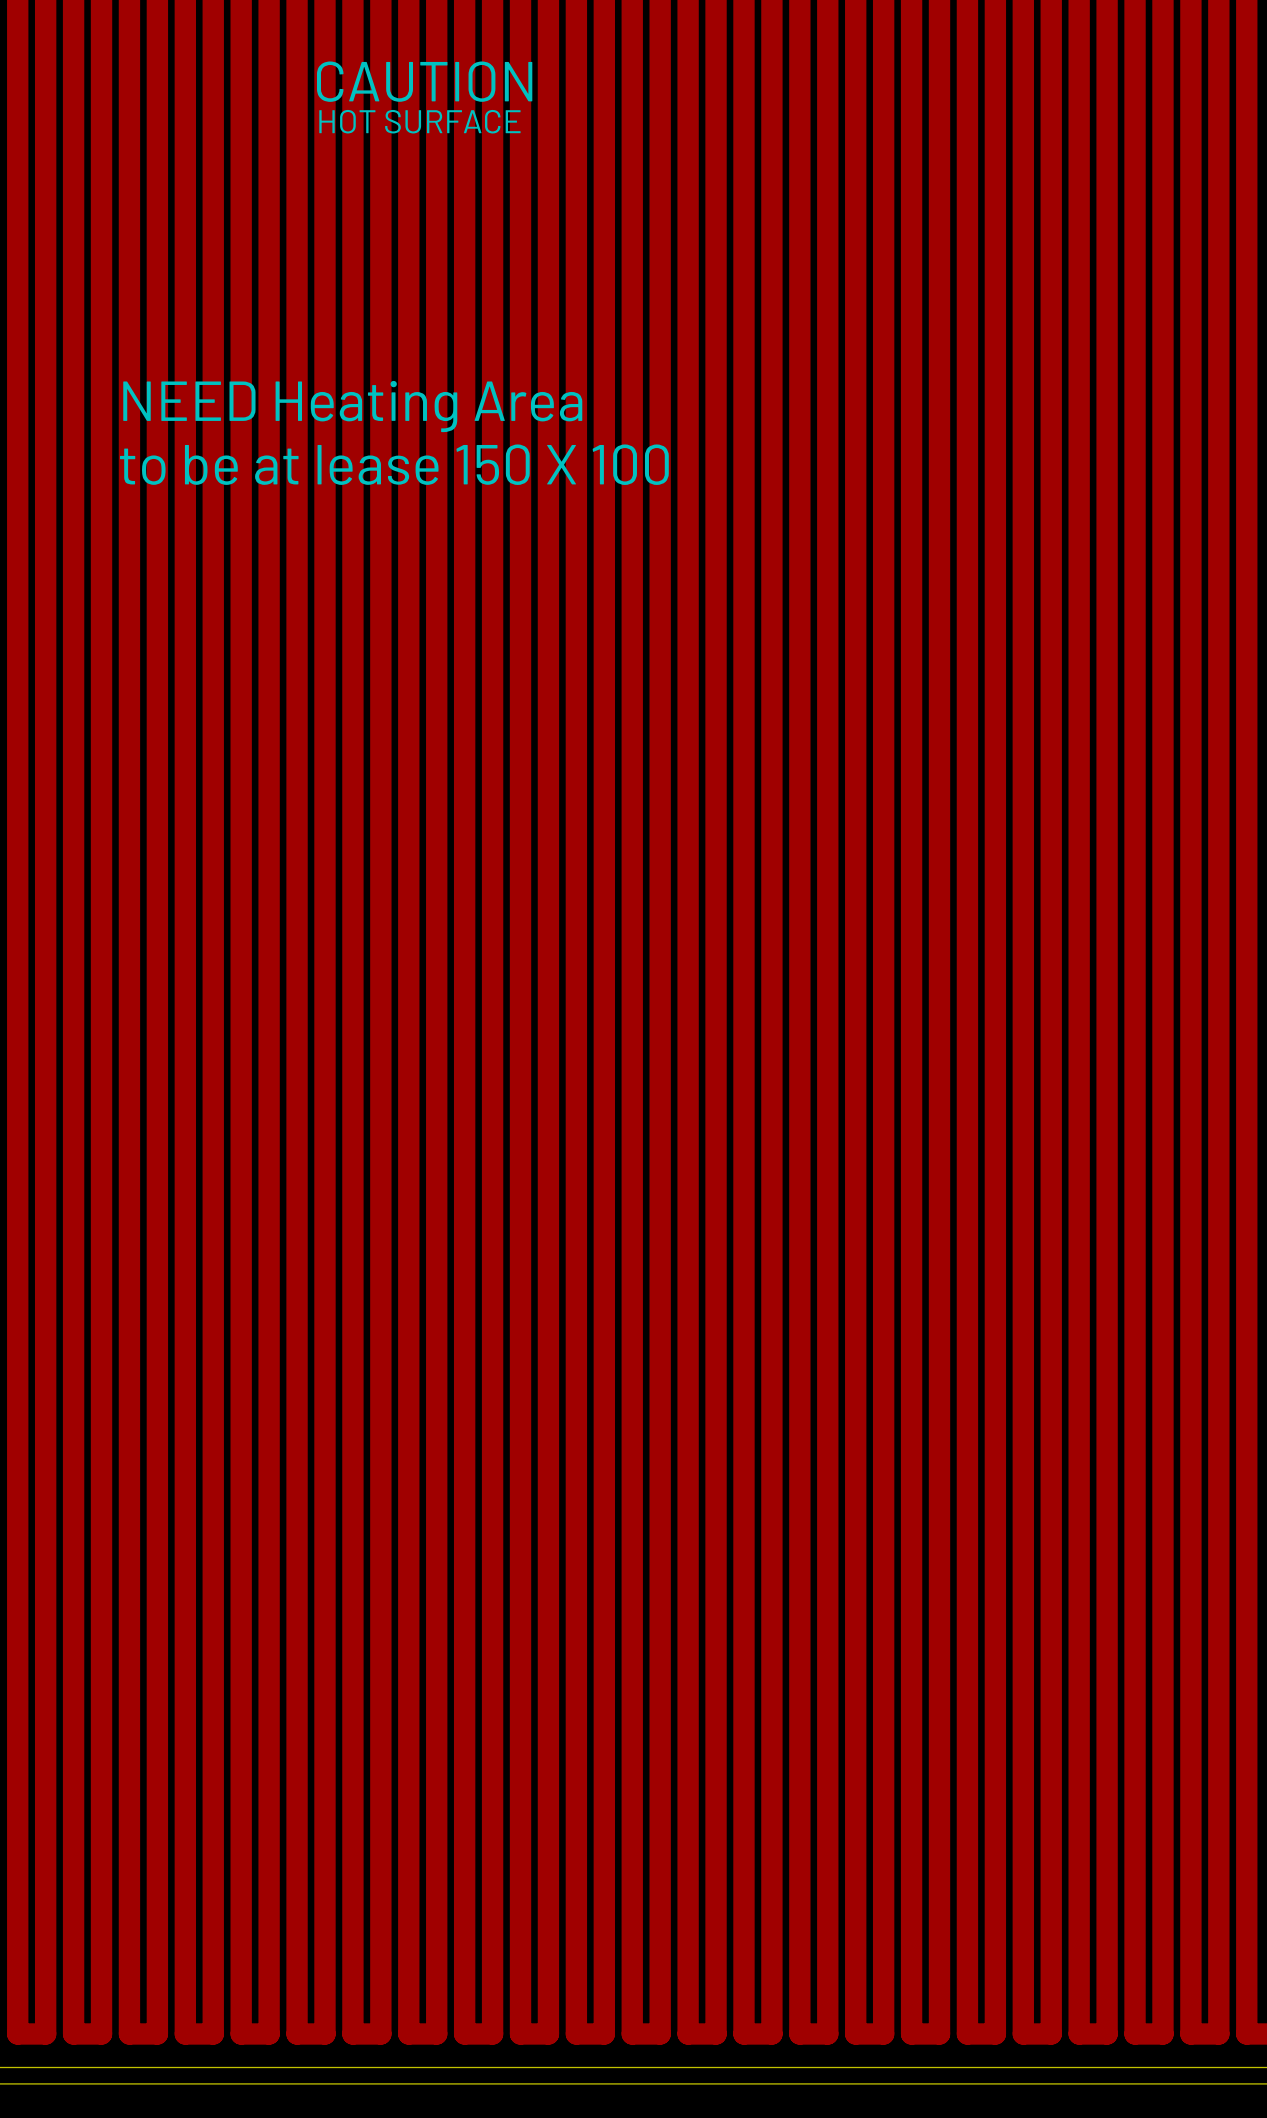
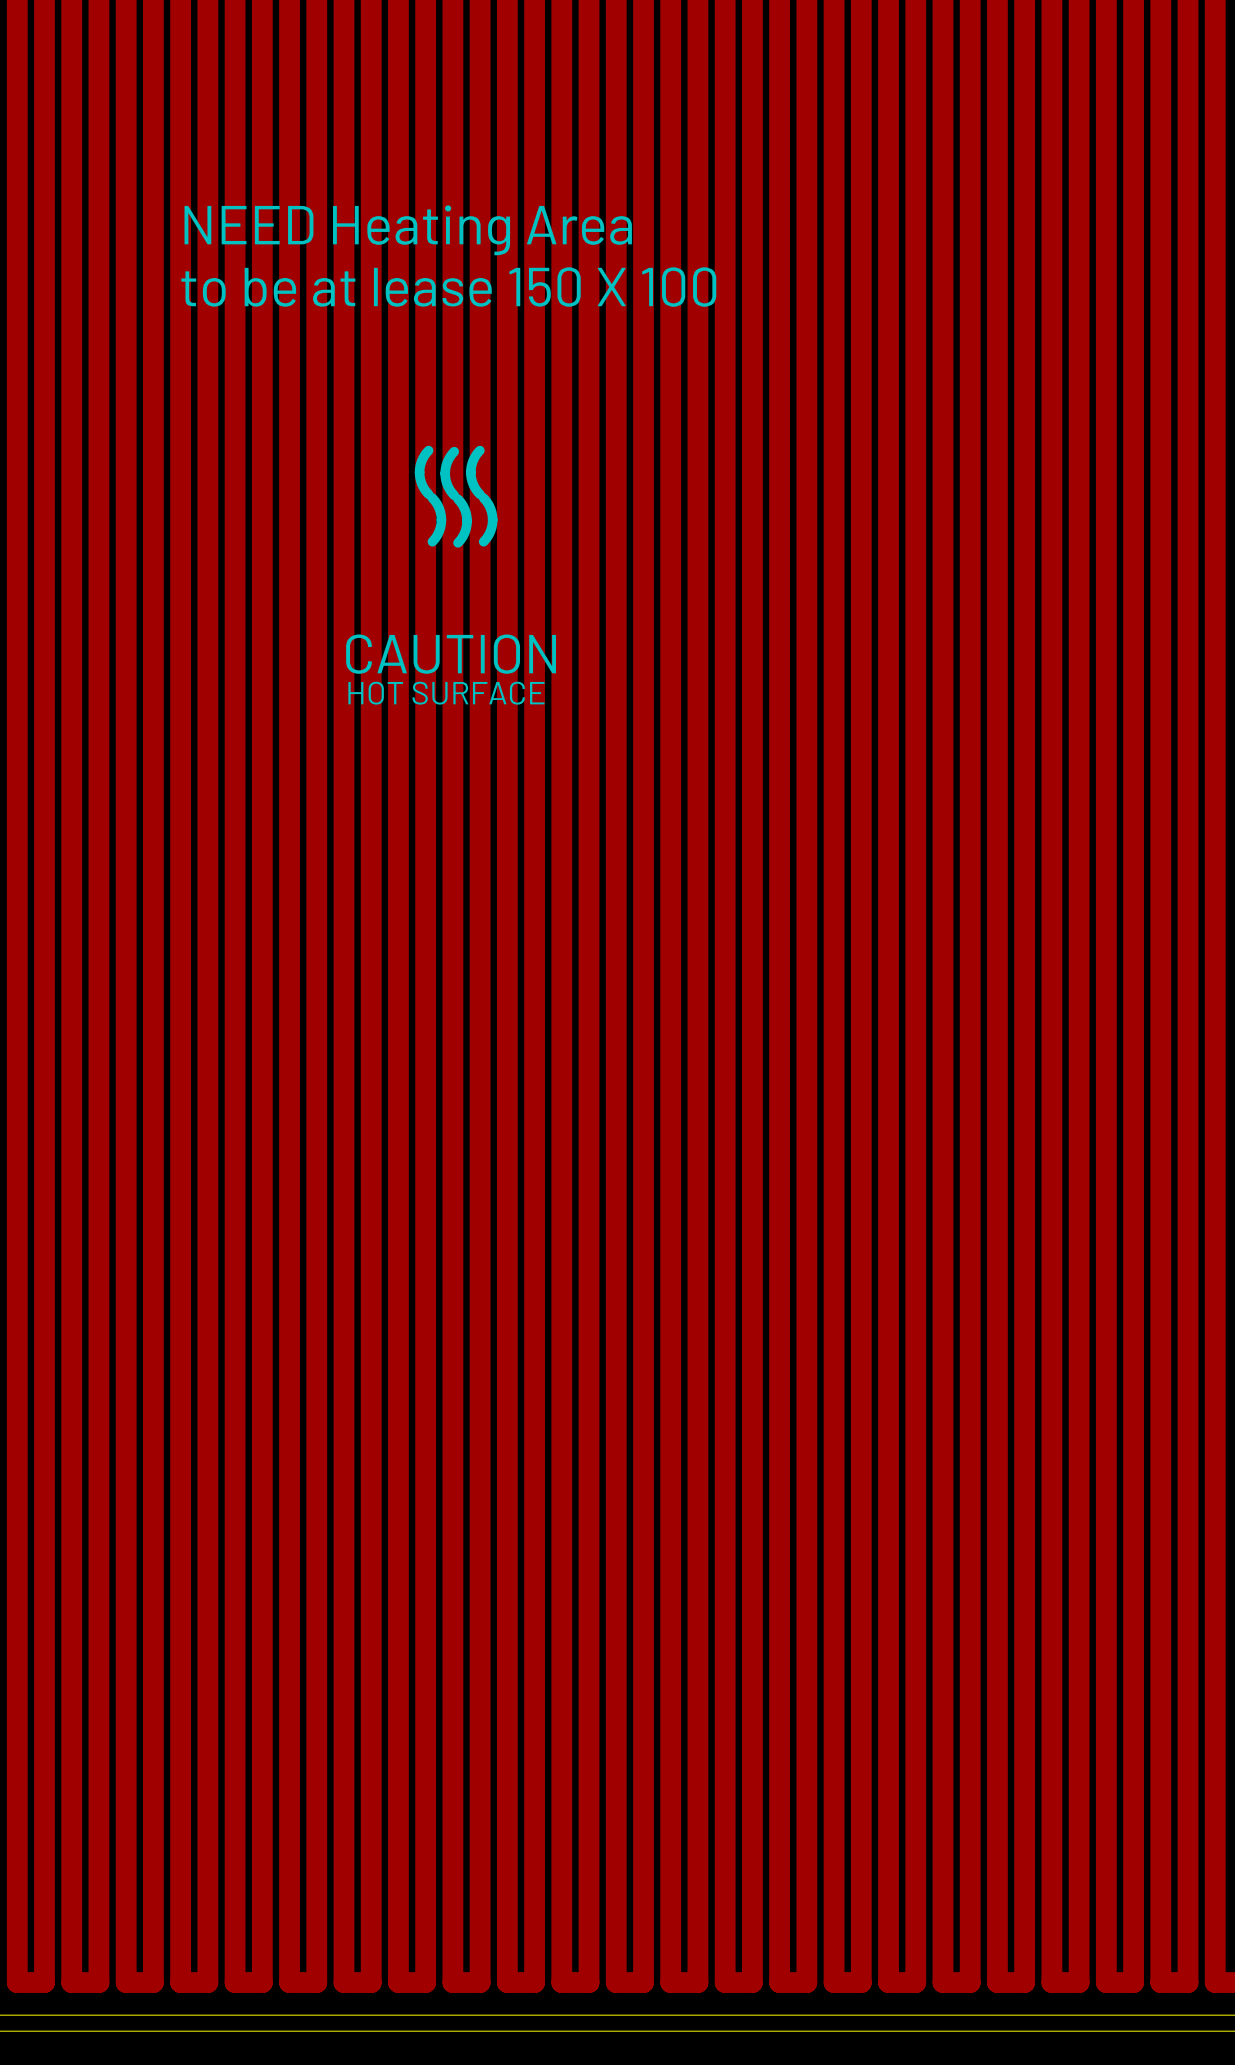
text: CAUTION (424, 81) -> none
text: HOT SURFACE (419, 121) -> none
text position: NEED Heating Area (352, 406) -> NEED Heating Area (408, 230)
line: none -> (428, 450) (421, 460) (419, 472) (421, 484) (428, 494)
line: none -> (479, 450) (473, 460) (470, 472) (473, 484) (479, 494)
line: none -> (454, 451) (447, 461) (445, 473) (447, 485) (454, 495)
text position: to be at lease 150 X 100 (394, 464) -> to be at lease 150 X 100 (448, 287)
line: none -> (432, 498) (439, 508) (441, 519)
line: none -> (483, 498) (490, 508) (492, 519)
line: none -> (458, 499) (464, 509) (467, 521) (464, 532) (458, 542)
line: none -> (441, 519) (439, 531) (432, 541)
line: none -> (492, 519) (490, 531) (483, 541)
text: none -> CAUTION (451, 654)
text: none -> HOT SURFACE (446, 693)

